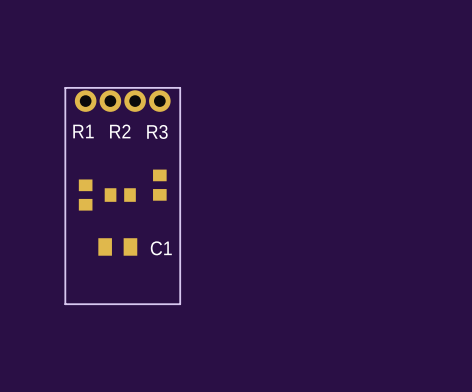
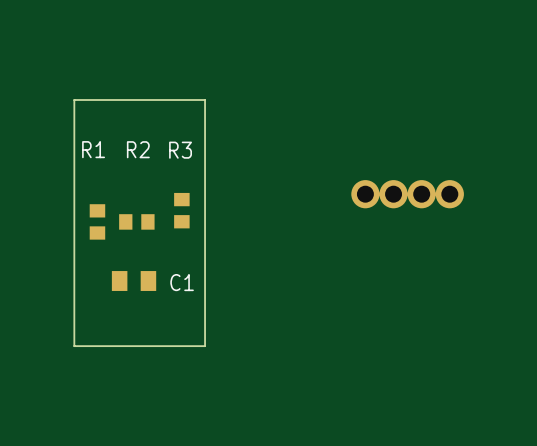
part: (122, 101) -> none
part: none -> (407, 194)

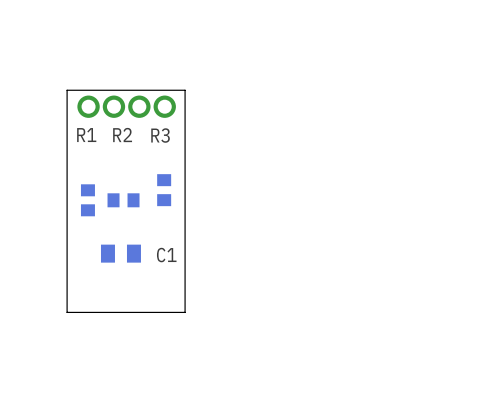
part: none -> (126, 106)
part: (407, 194) -> none

